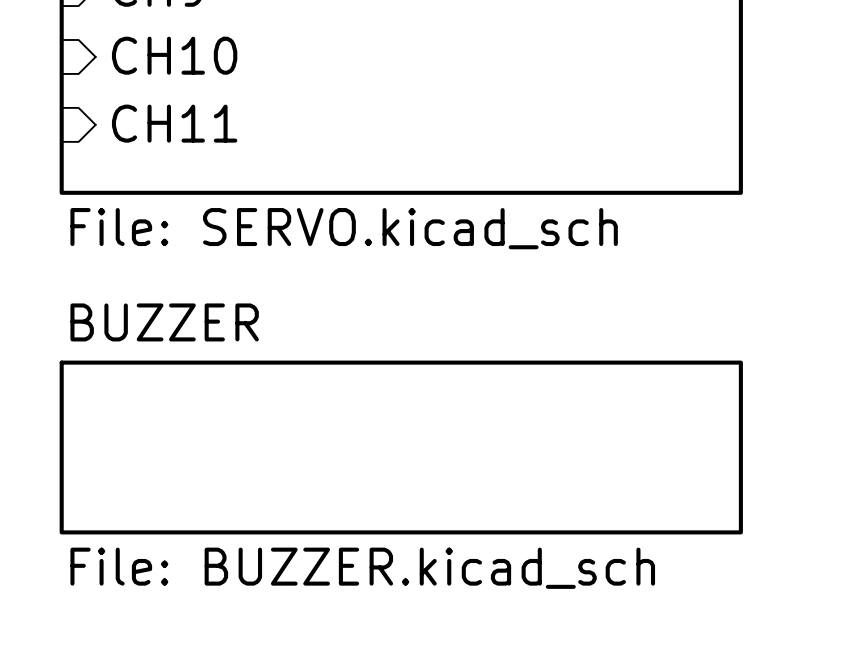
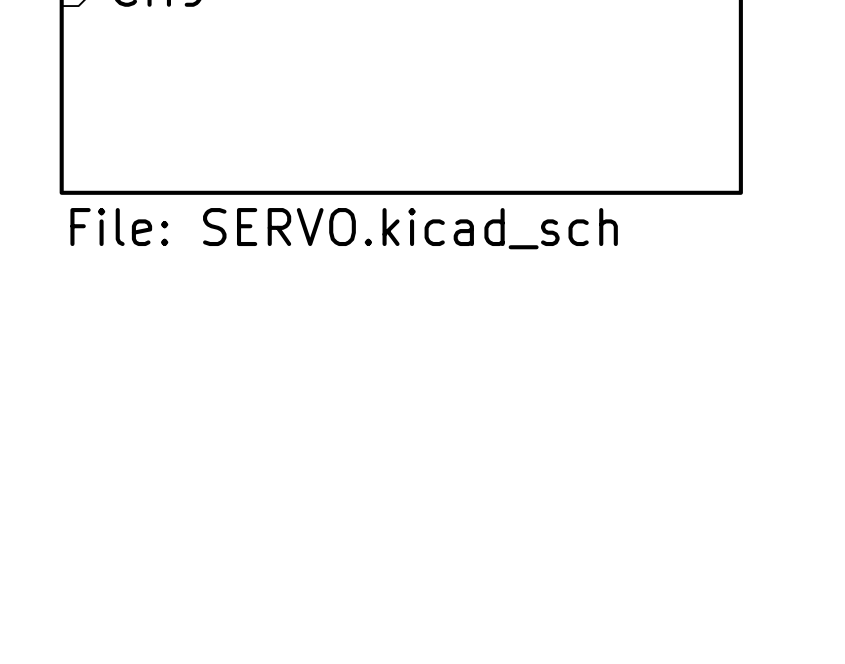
sheet pin: CH10 (174, 55) -> none
sheet pin: CH11 (174, 123) -> none
sheet BUZZER: File: BUZZER.kicad_sch (401, 447) -> none

